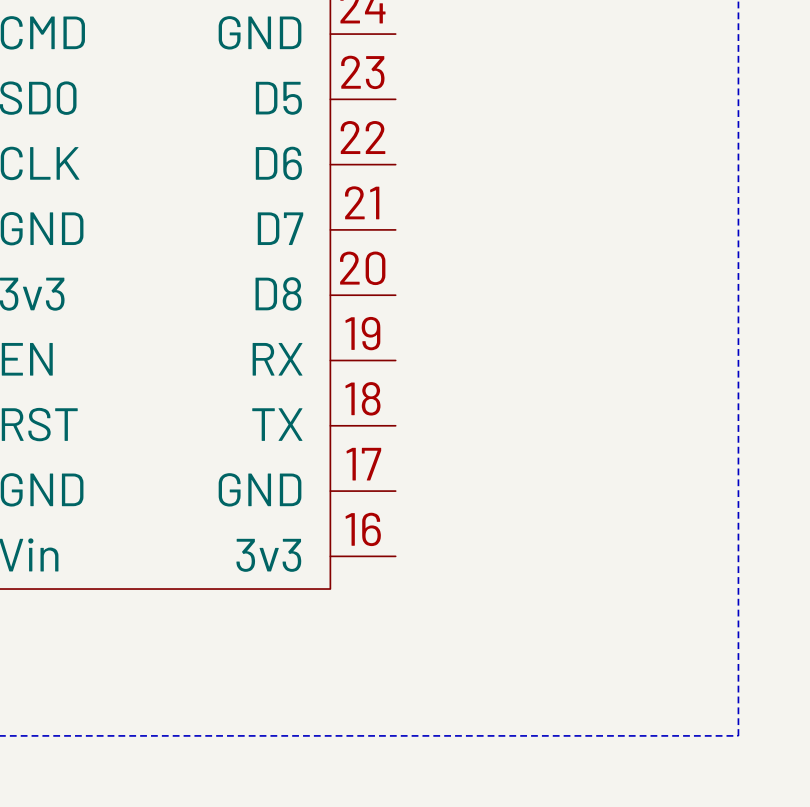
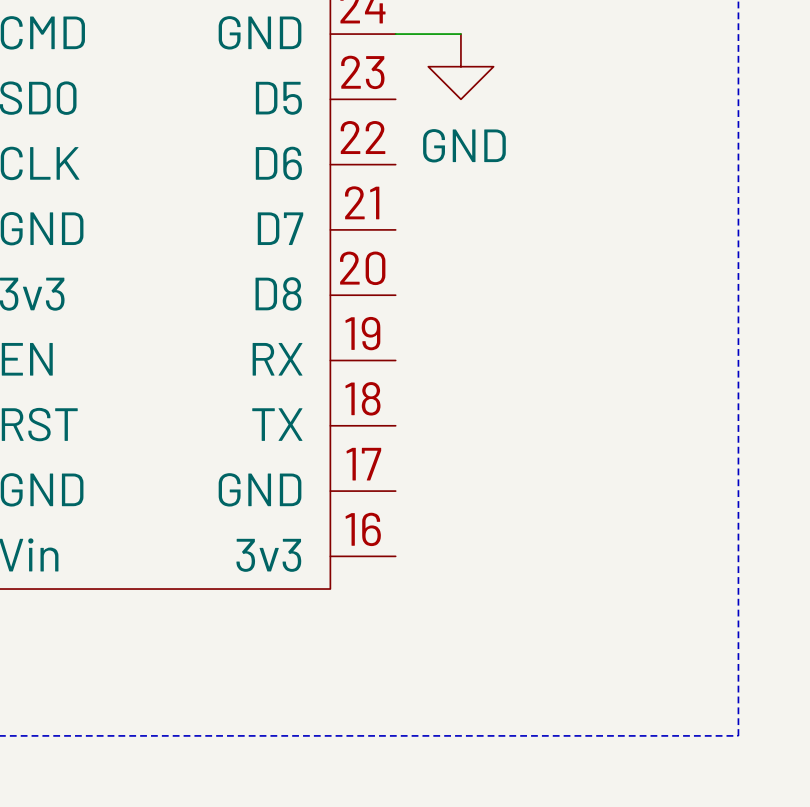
wire: none -> (395, 34) (460, 34)
power symbol: none -> GND (460, 66)

